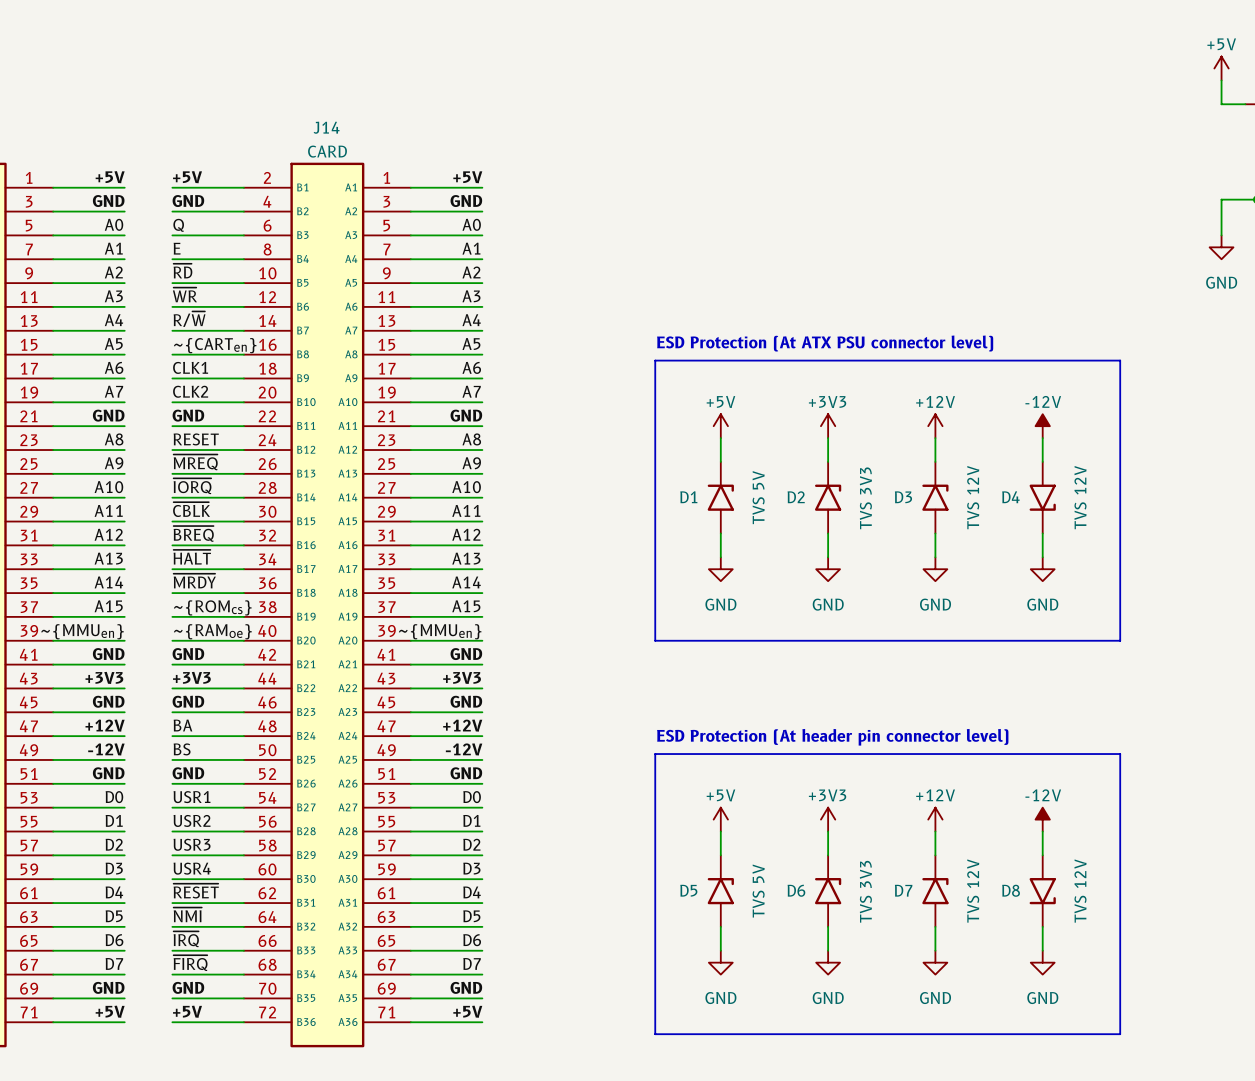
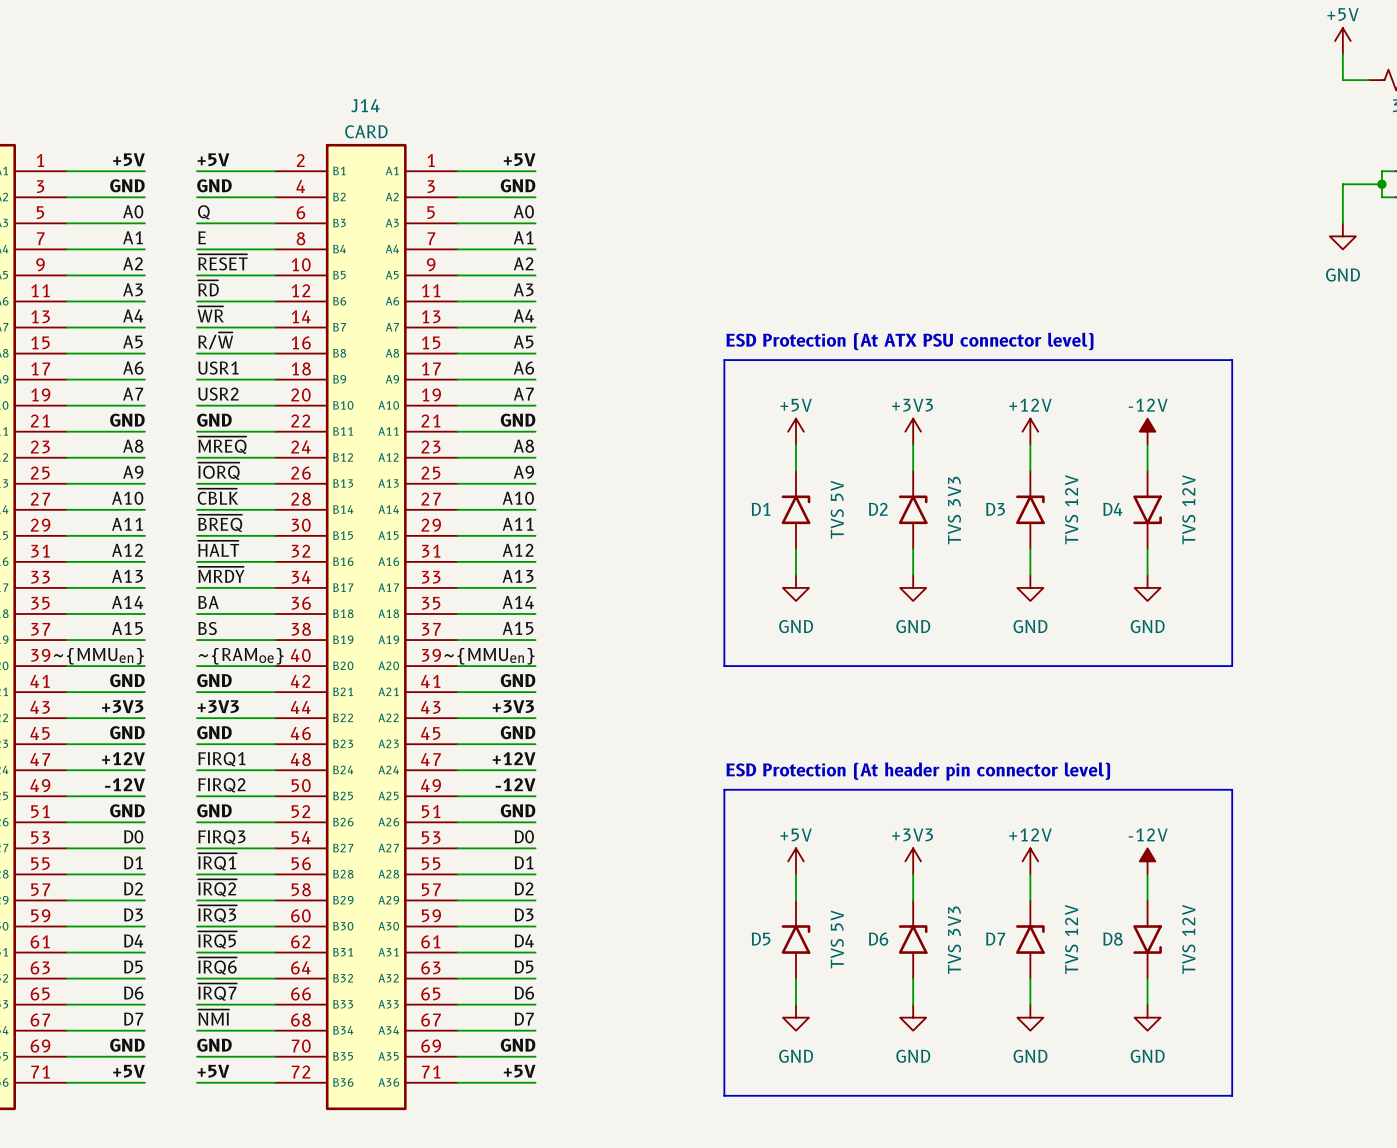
label: ~{RD} (182, 271) -> ~{RESET} (222, 262)
label: ~{WR} (184, 294) -> ~{RD} (208, 288)
label: R/~{W} (189, 319) -> ~{WR} (210, 314)
label: ~{CARTen} (215, 345) -> R/~{W} (215, 340)
label: CLK1 (190, 367) -> USR1 (218, 368)
label: CLK2 (190, 391) -> USR2 (218, 394)
label: RESET (196, 439) -> ~{MREQ} (222, 445)
label: ~{MREQ} (195, 462) -> ~{IORQ} (218, 471)
label: ~{IORQ} (192, 486) -> ~{CBLK} (217, 496)
label: ~{CBLK} (191, 509) -> ~{BREQ} (220, 523)
label: ~{BREQ} (193, 533) -> ~{HALT} (218, 548)
label: ~{HALT} (192, 557) -> ~{MRDY} (221, 574)
label: ~{MRDY} (194, 581) -> BA (208, 602)
label: ~{ROMcs} (212, 607) -> BS (207, 628)
label: BA (182, 725) -> FIRQ1 (221, 759)
label: BS (182, 749) -> FIRQ2 (221, 785)
label: USR1 (192, 797) -> FIRQ3 (221, 837)
label: USR2 (192, 820) -> ~{IRQ1} (217, 861)
label: USR3 (192, 844) -> ~{IRQ2} (217, 887)
label: USR4 (192, 868) -> ~{IRQ3} (217, 914)
label: ~{RESET} (196, 891) -> ~{IRQ5} (217, 940)
label: ~{NMI} (187, 914) -> ~{IRQ6} (217, 966)
label: ~{IRQ} (186, 939) -> ~{IRQ7} (217, 992)
label: ~{FIRQ} (190, 963) -> ~{NMI} (213, 1017)

